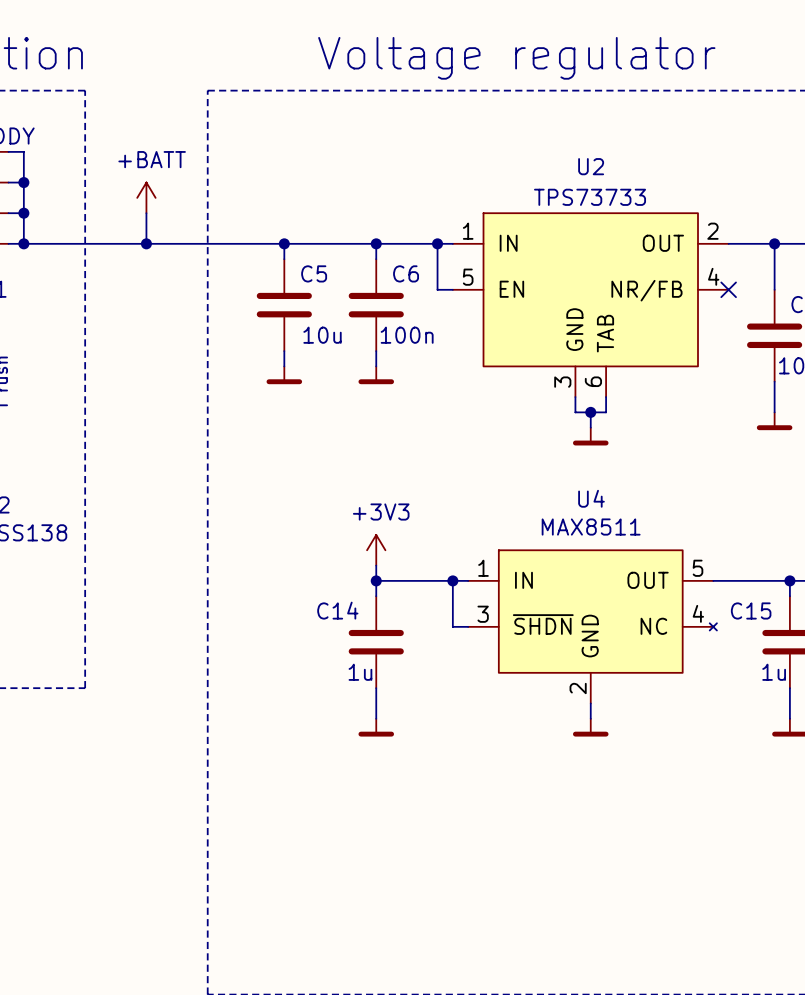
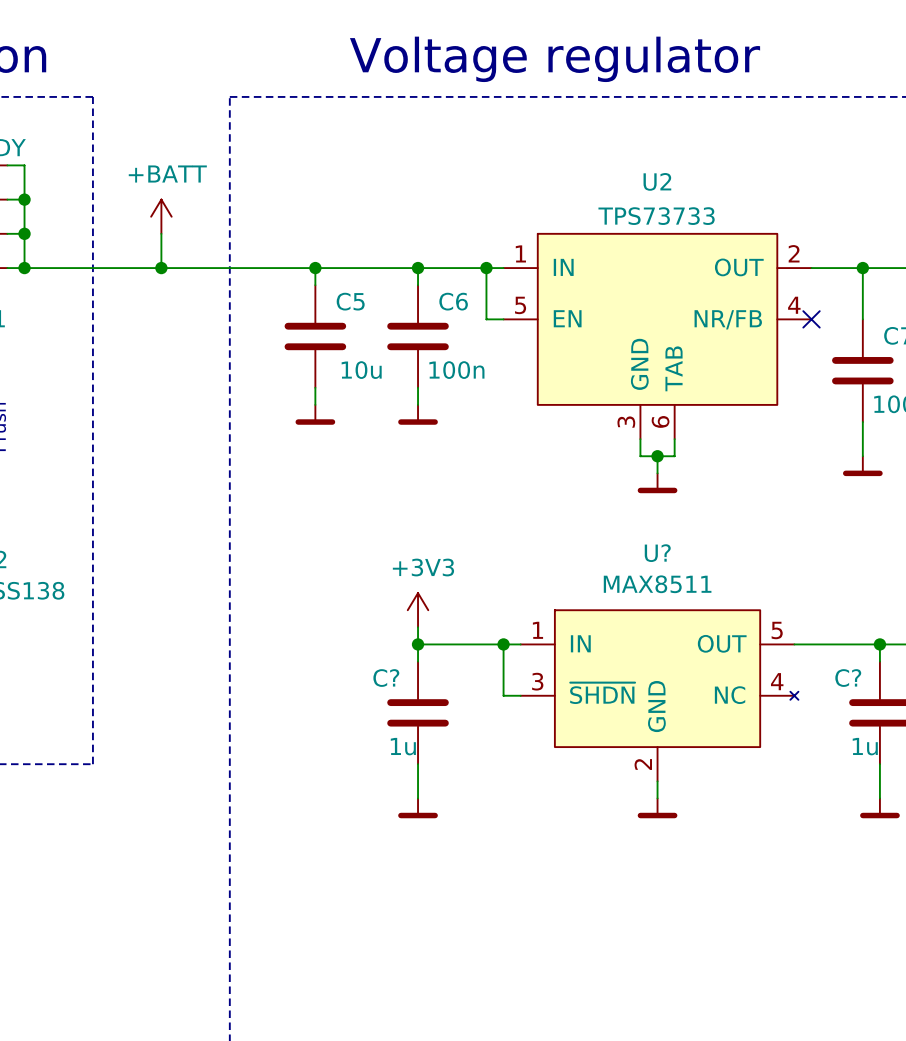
U4 name: U4 (591, 498) -> U? (657, 553)
C14 name: C14 (337, 610) -> C? (386, 678)
C15 name: C15 (751, 610) -> C? (848, 678)

